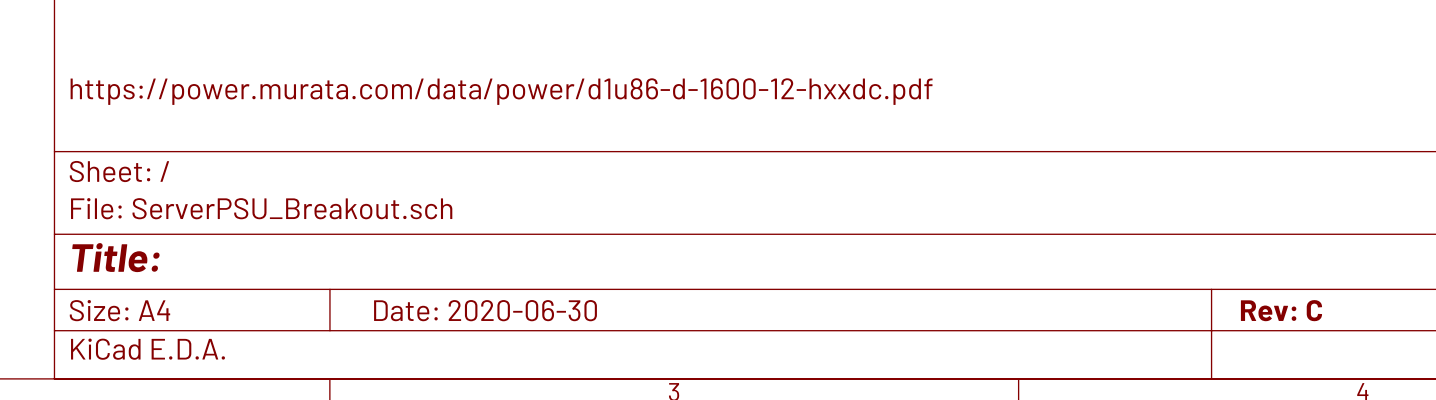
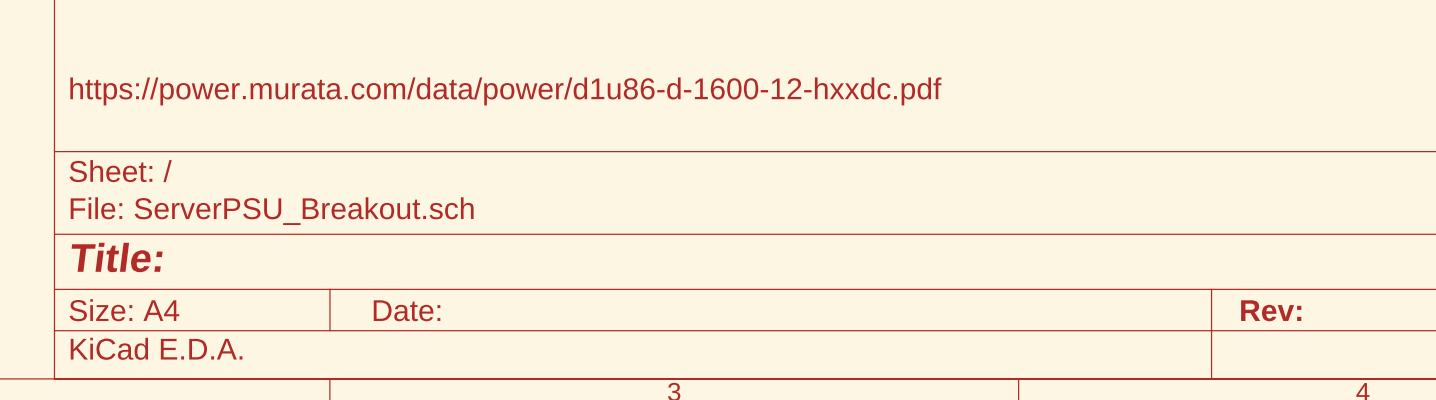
title block: Date: 2020-06-30 (485, 310) -> Date: (407, 310)
title block: Rev: C (1281, 310) -> Rev: (1271, 310)

